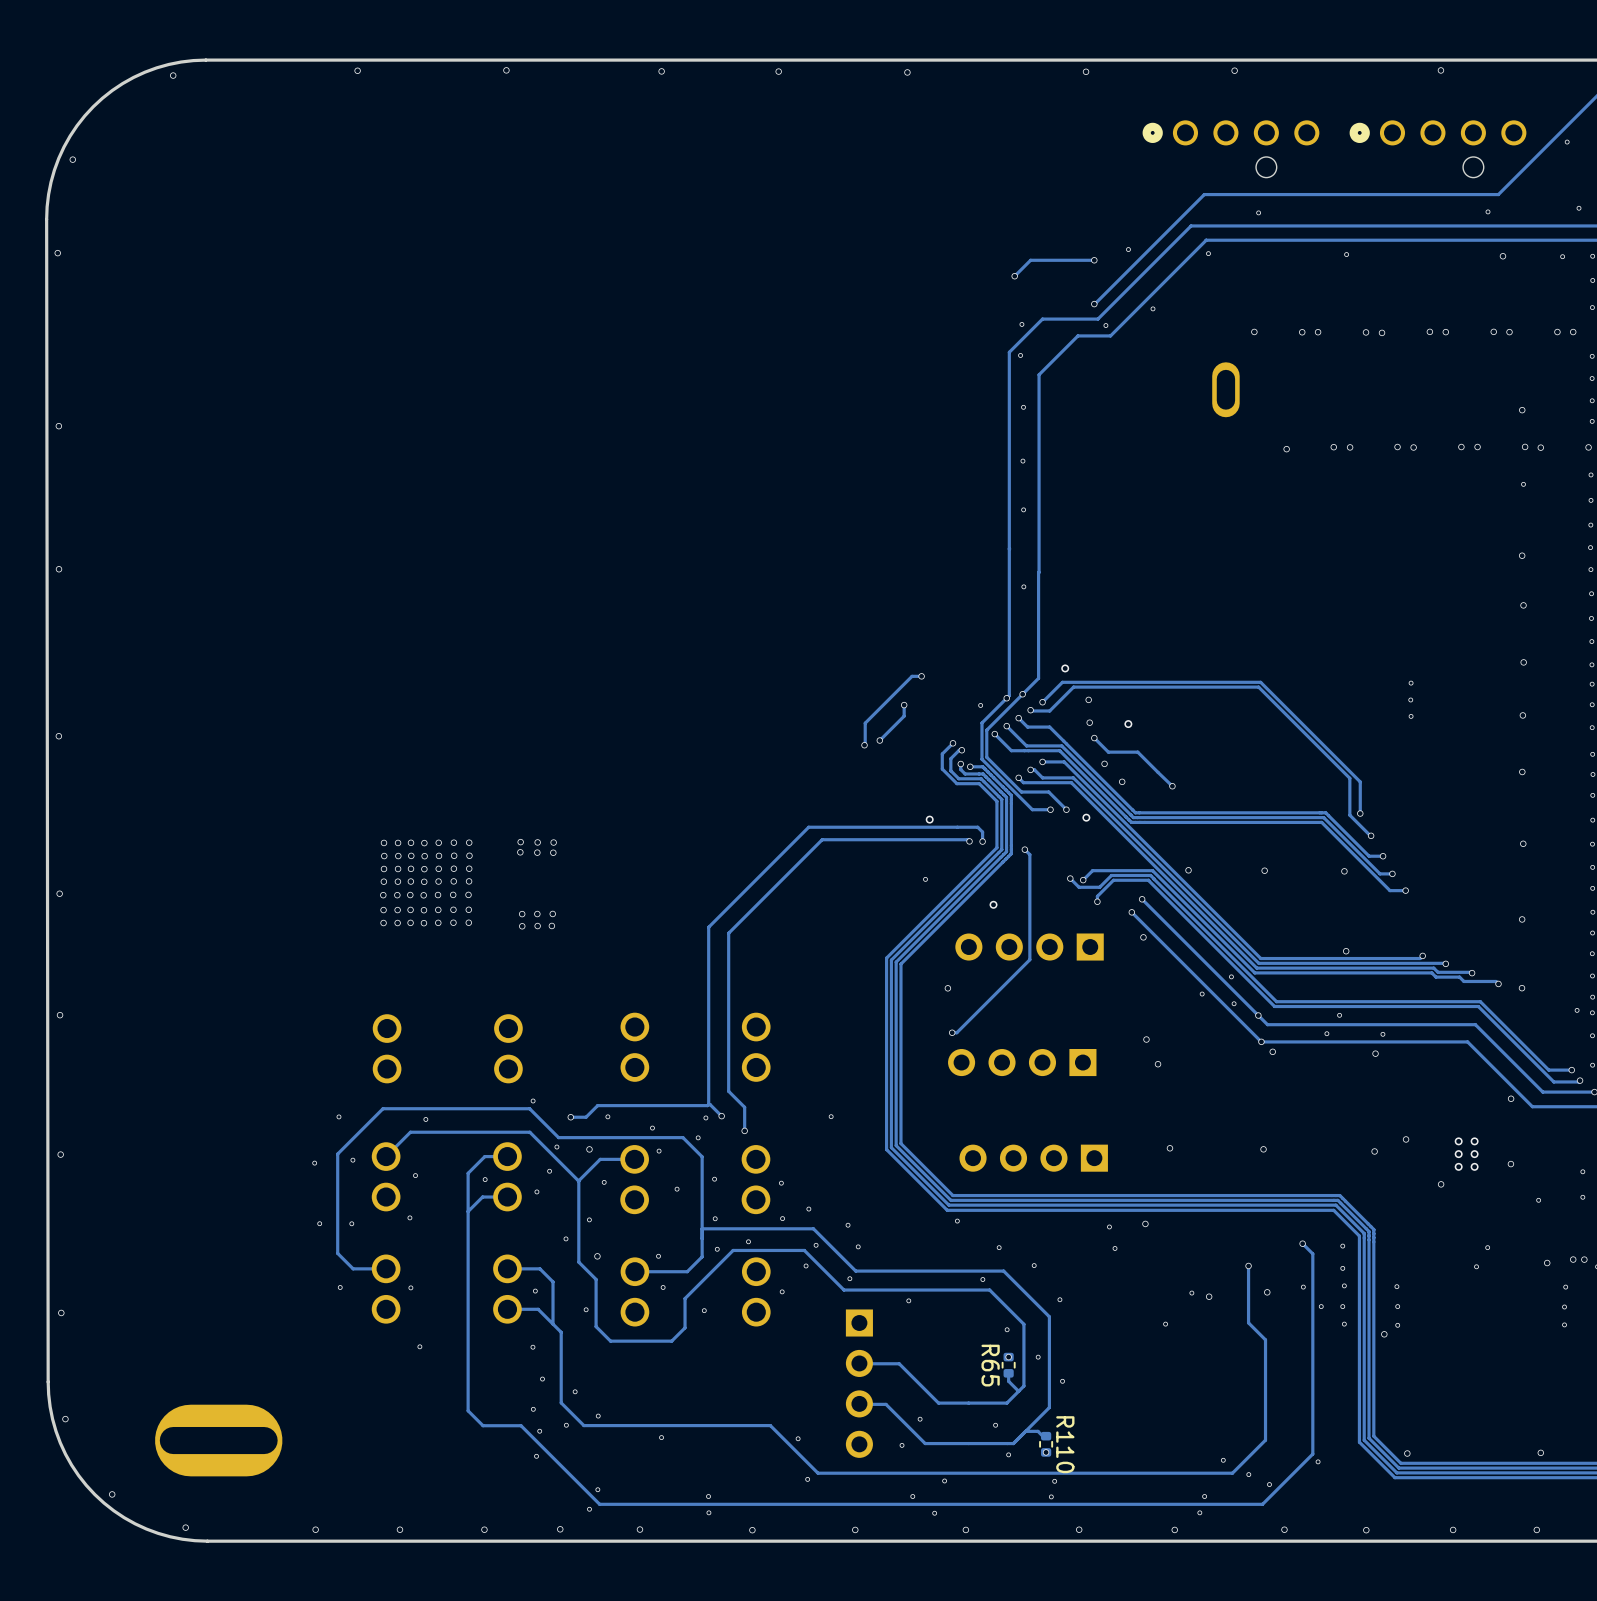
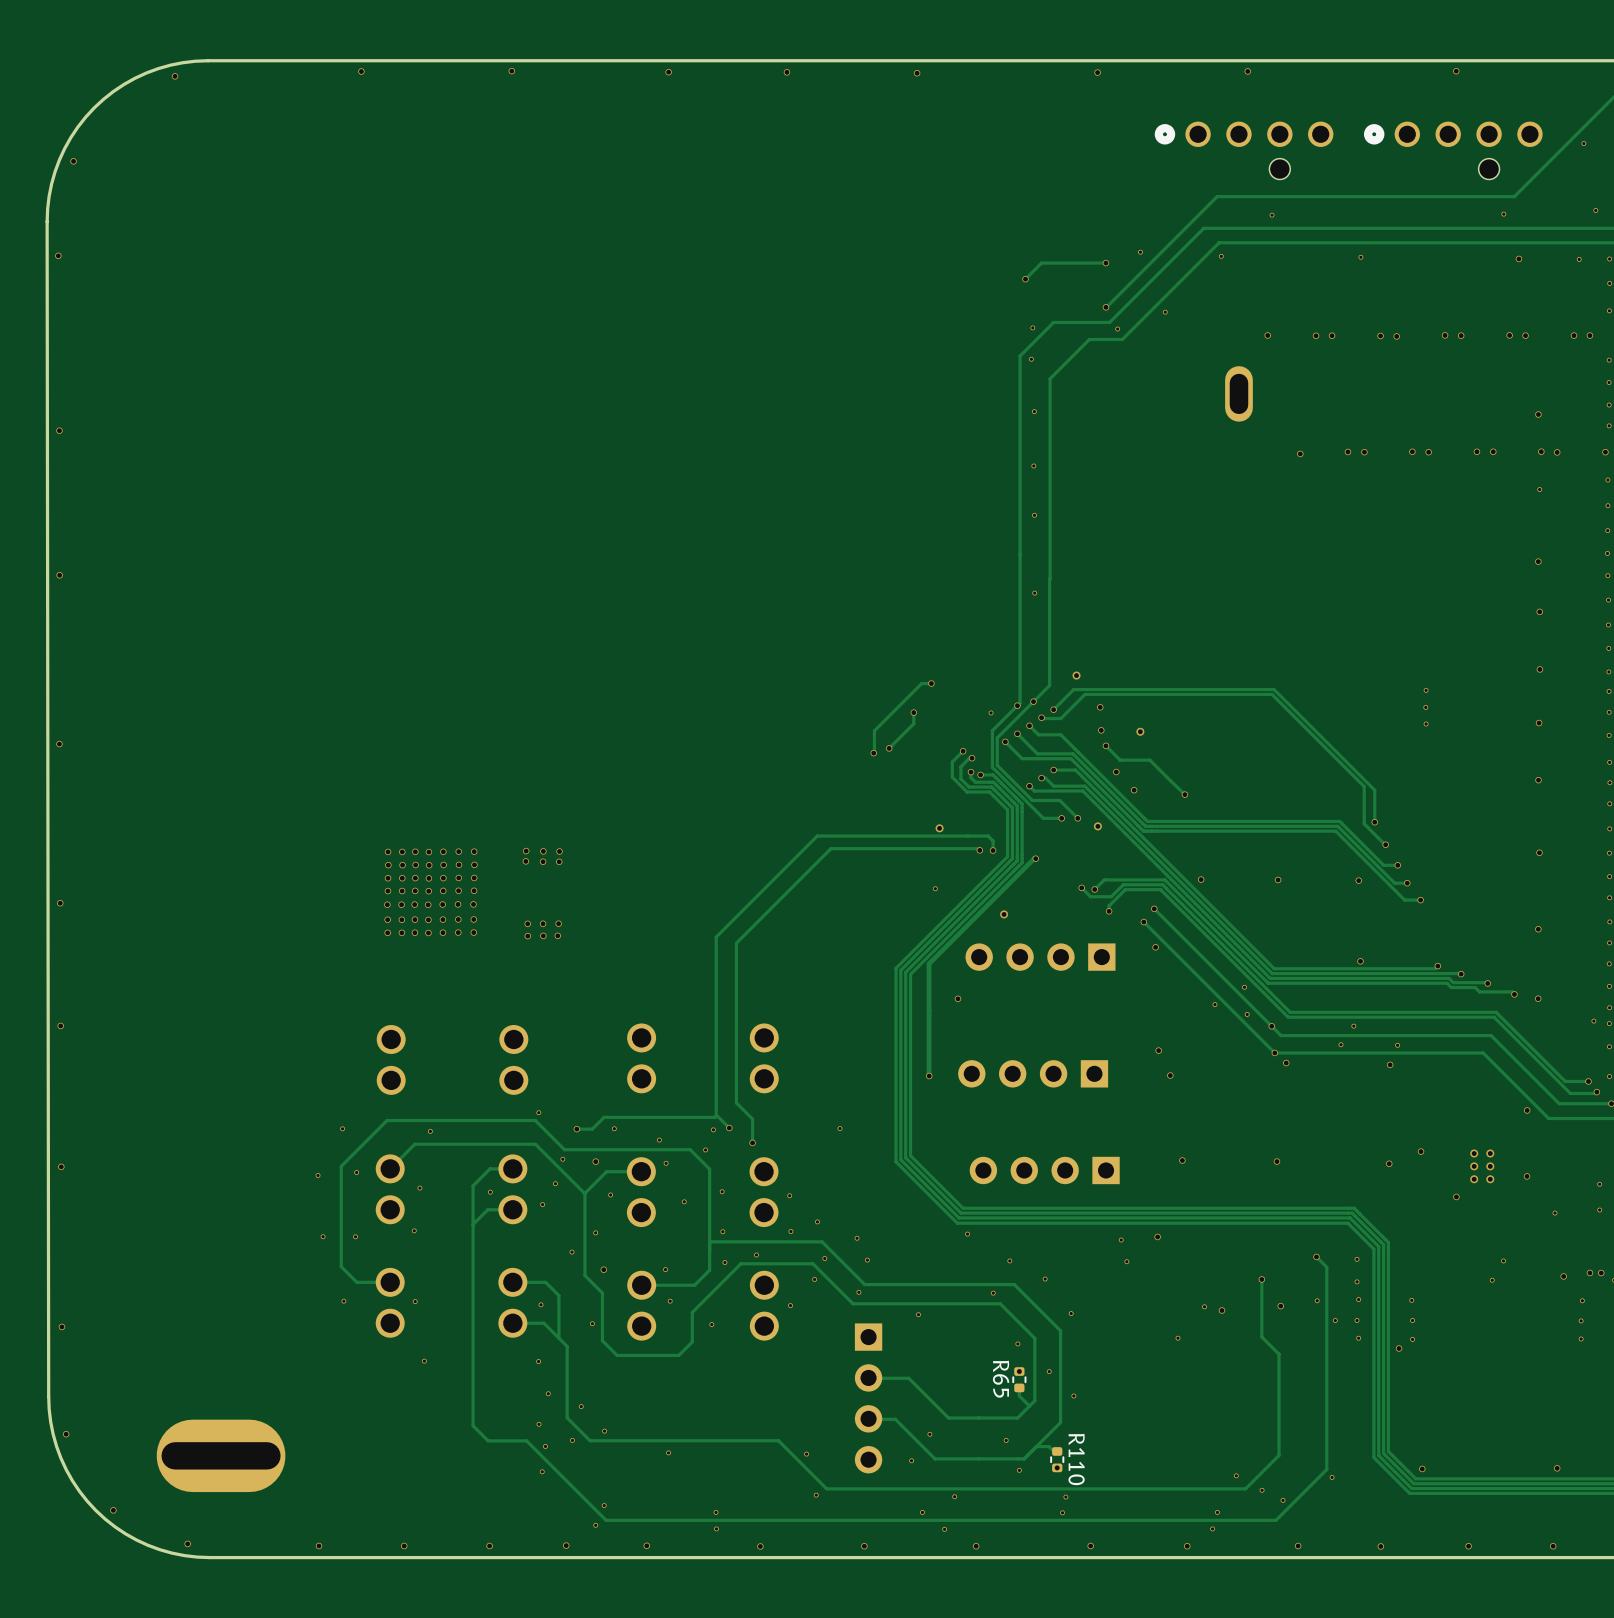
track: (1024, 849) (1029, 854) (1029, 959) (956, 1032) (952, 1032) -> (1035, 858) (929, 963) (929, 1075)
via position: (952, 1032) -> (929, 1076)

